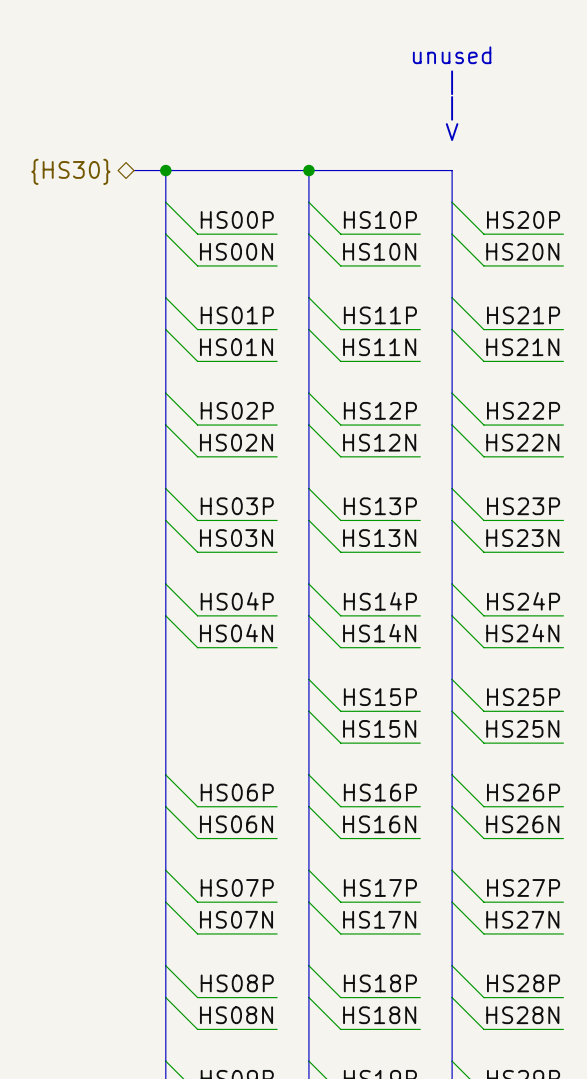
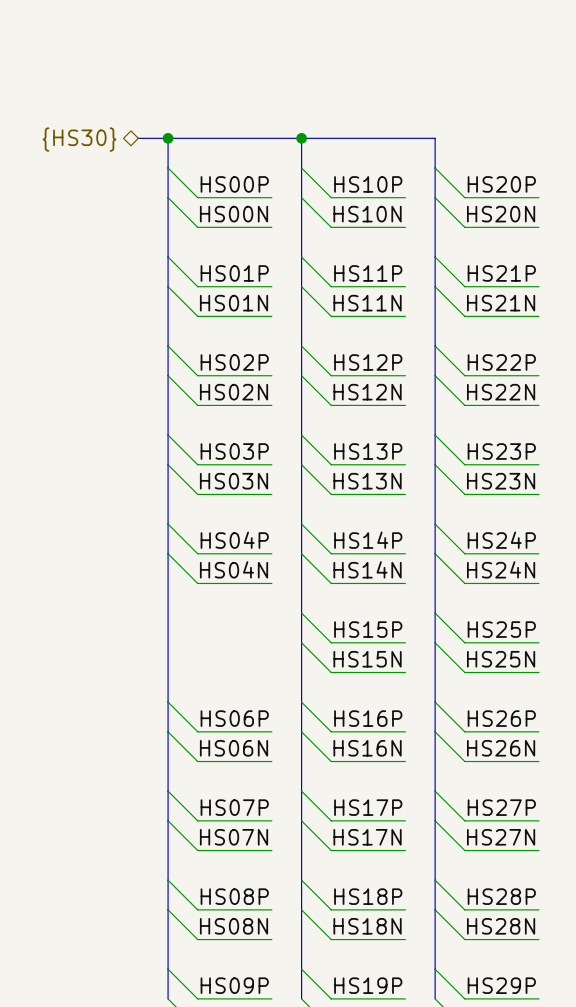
text: unused (452, 55) -> none
text: | (452, 82) -> none
text: | (452, 108) -> none
text: V (452, 132) -> none

